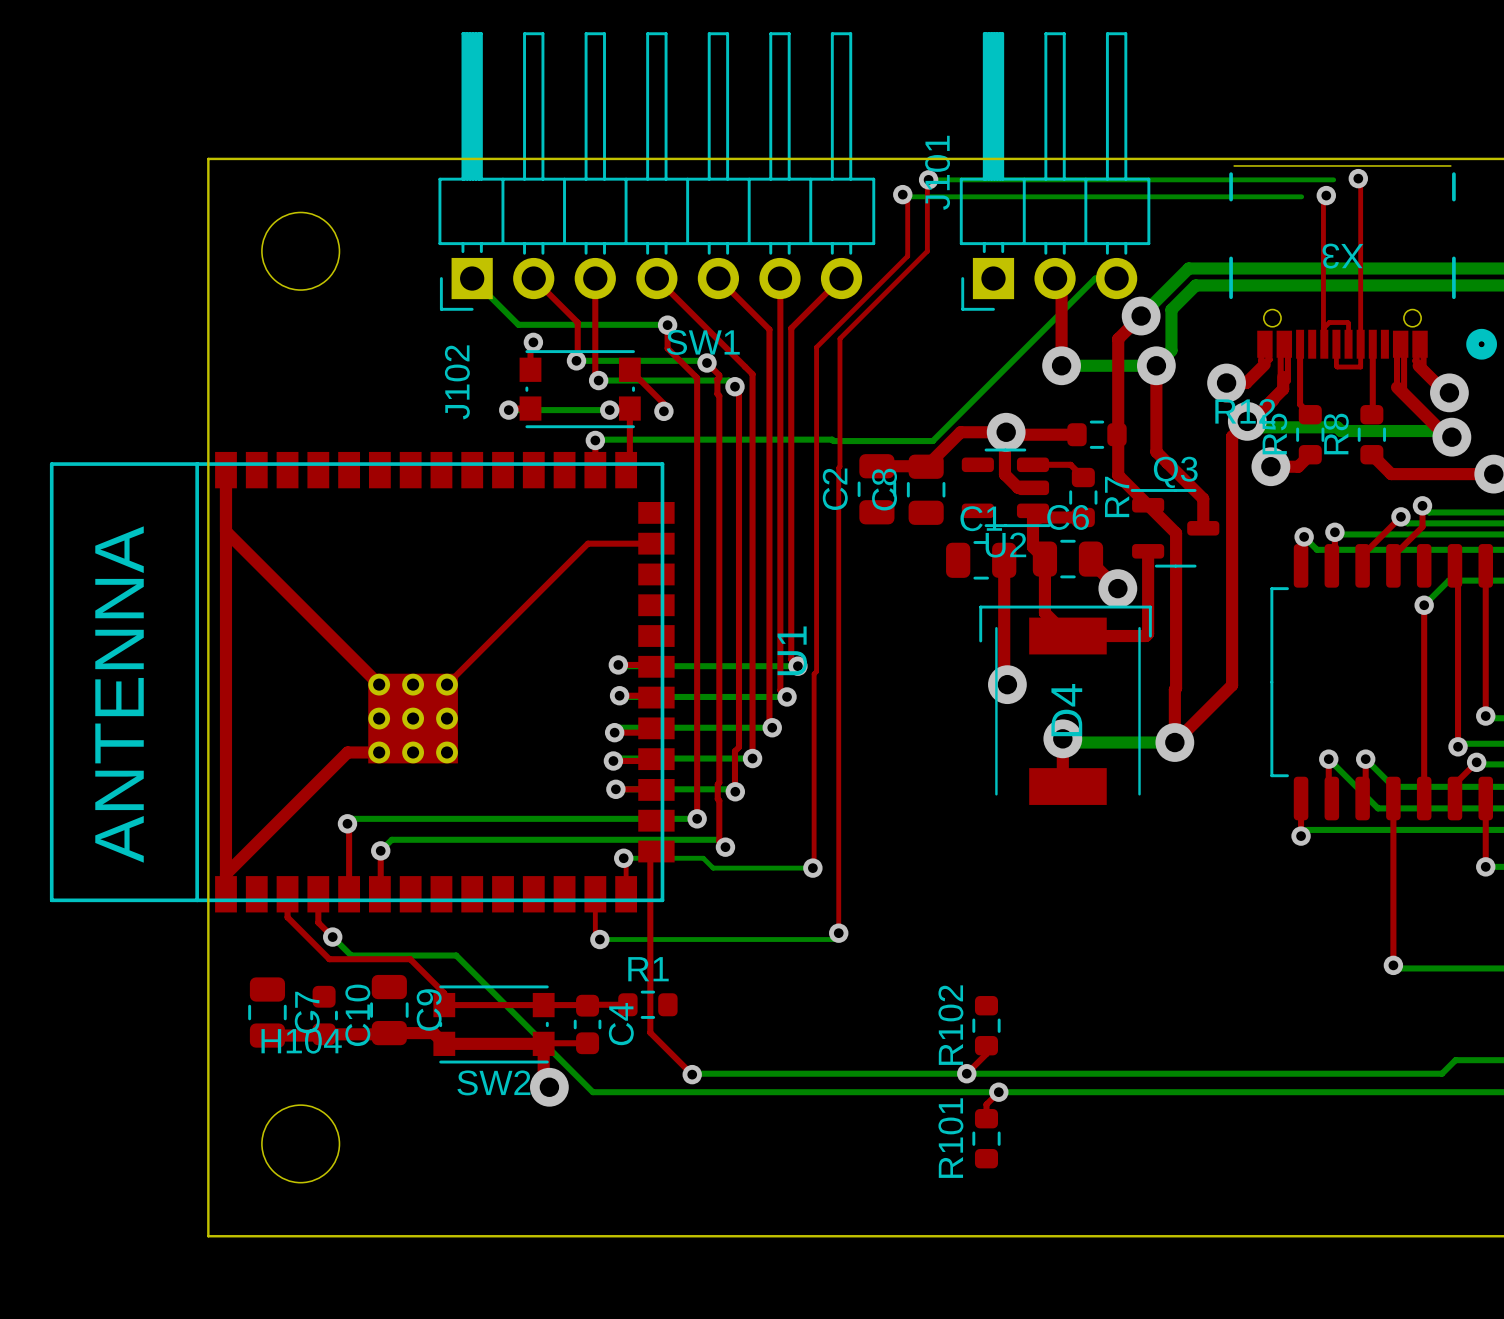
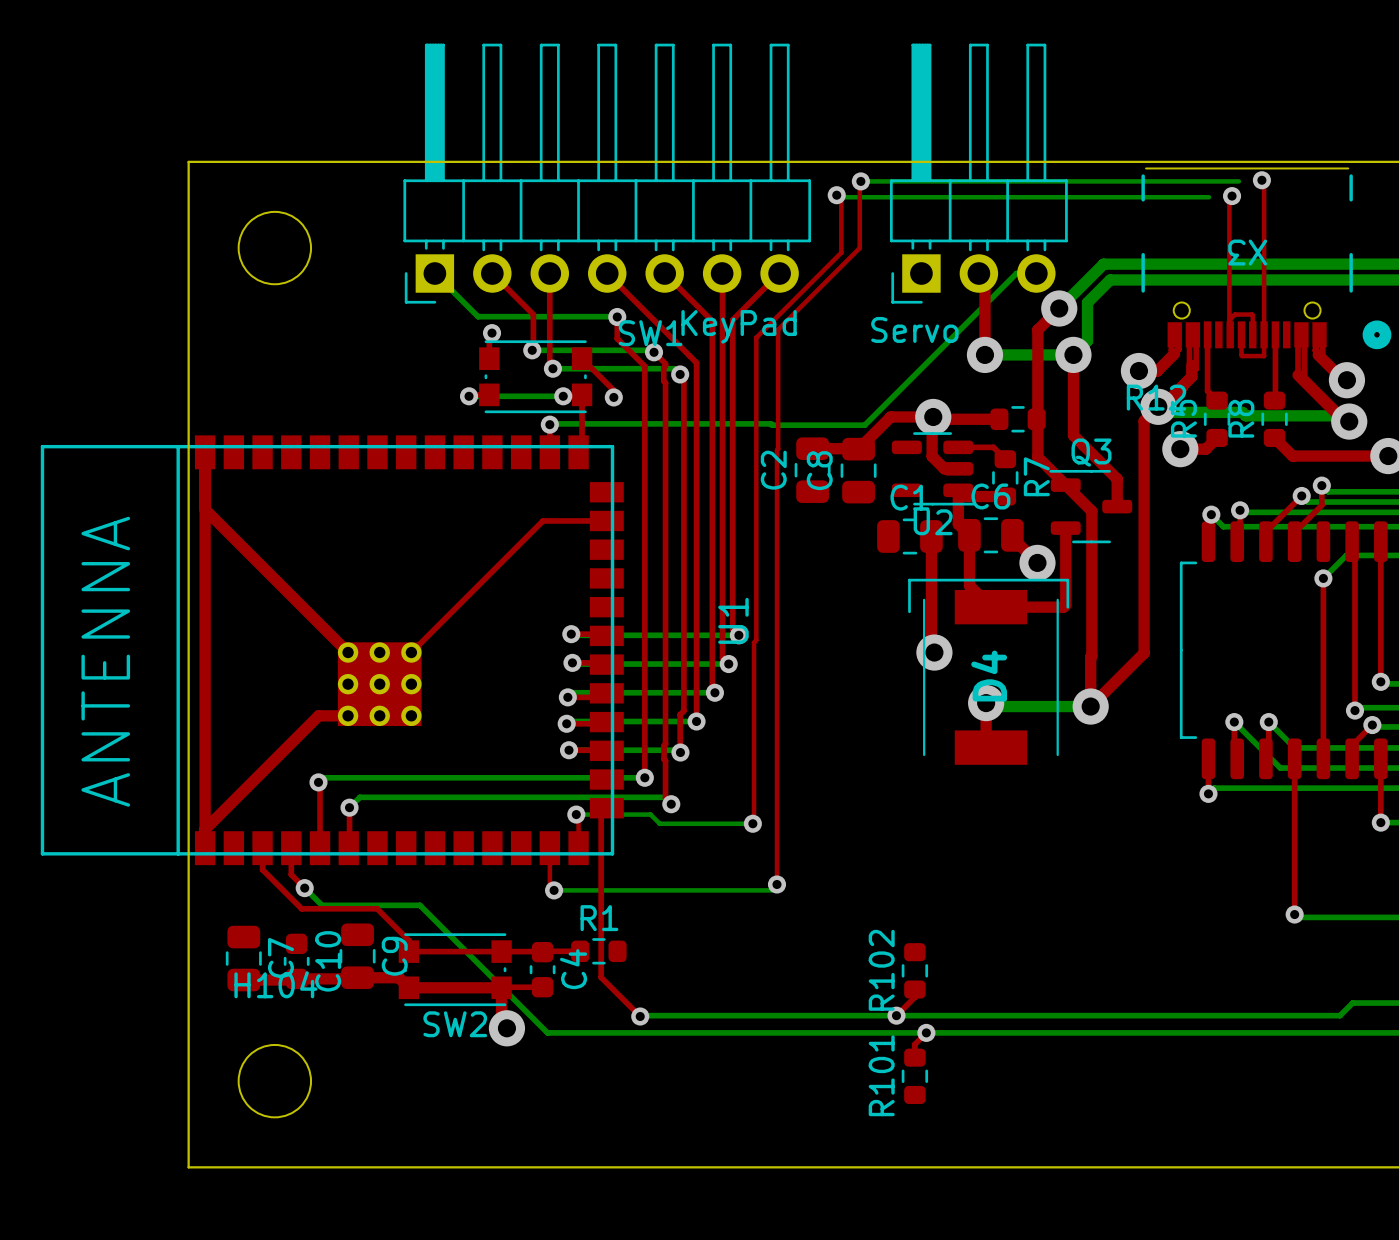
J101 name: J101 (937, 172) -> none
J102 value: none -> KeyPad (739, 326)
J101 value: none -> Servo (914, 329)
J102 name: J102 (457, 382) -> none

